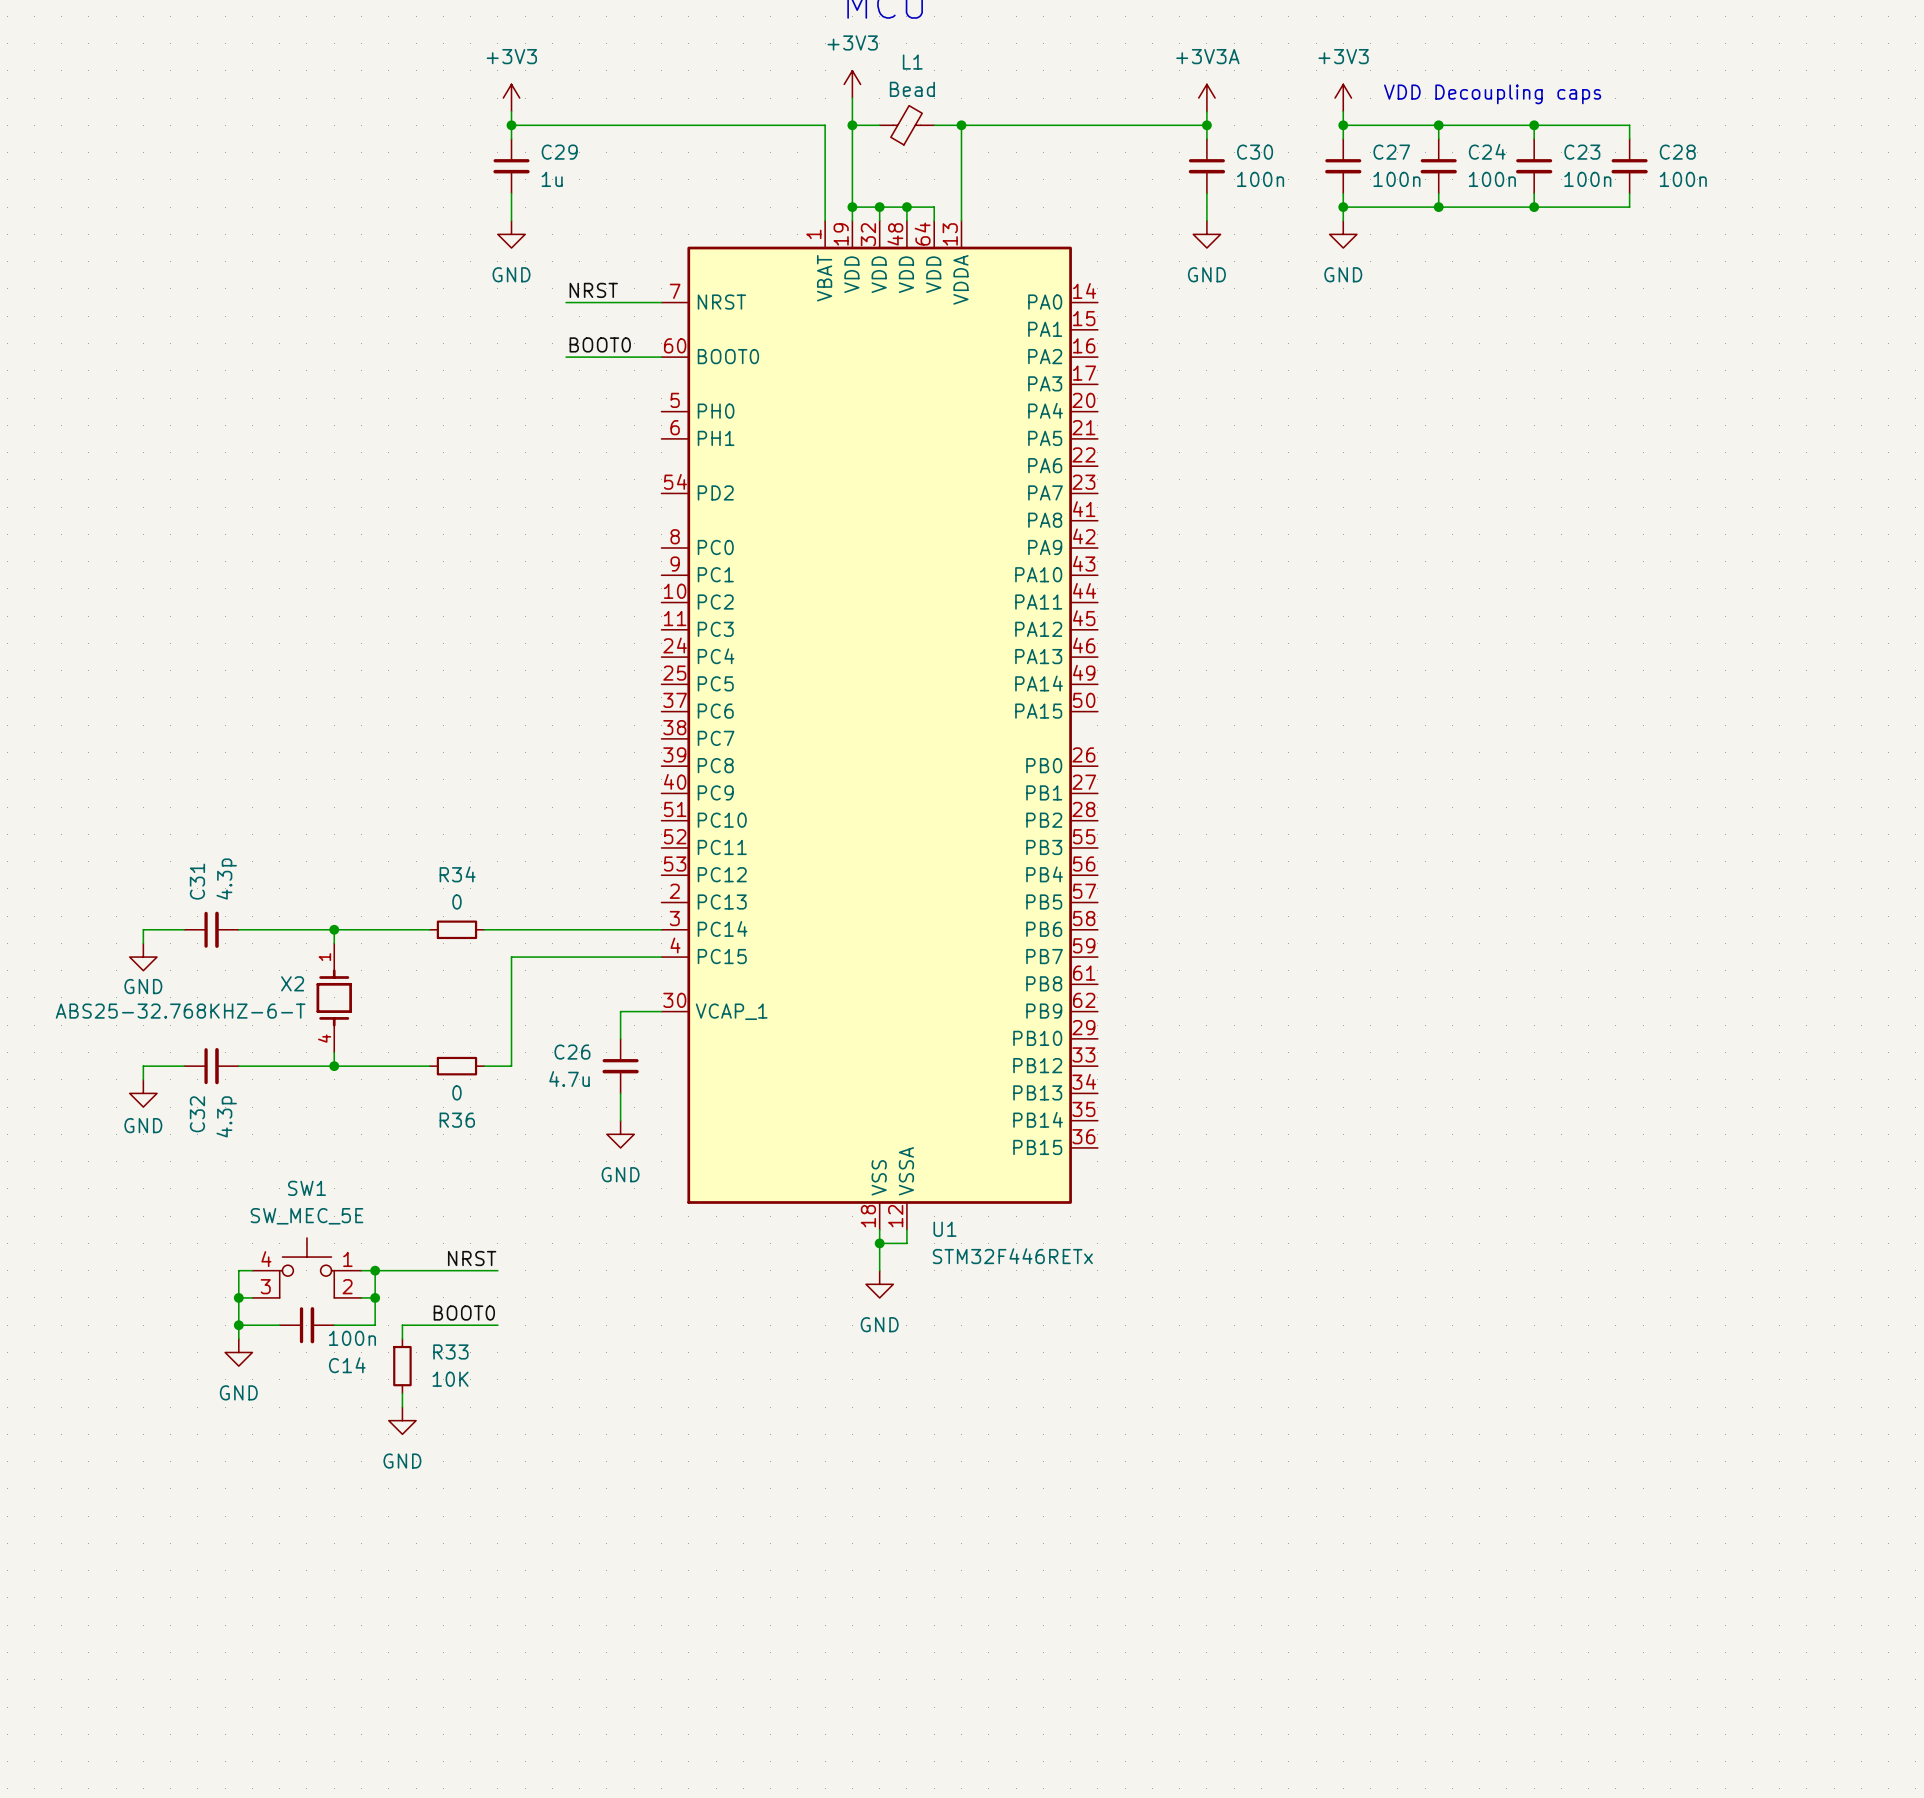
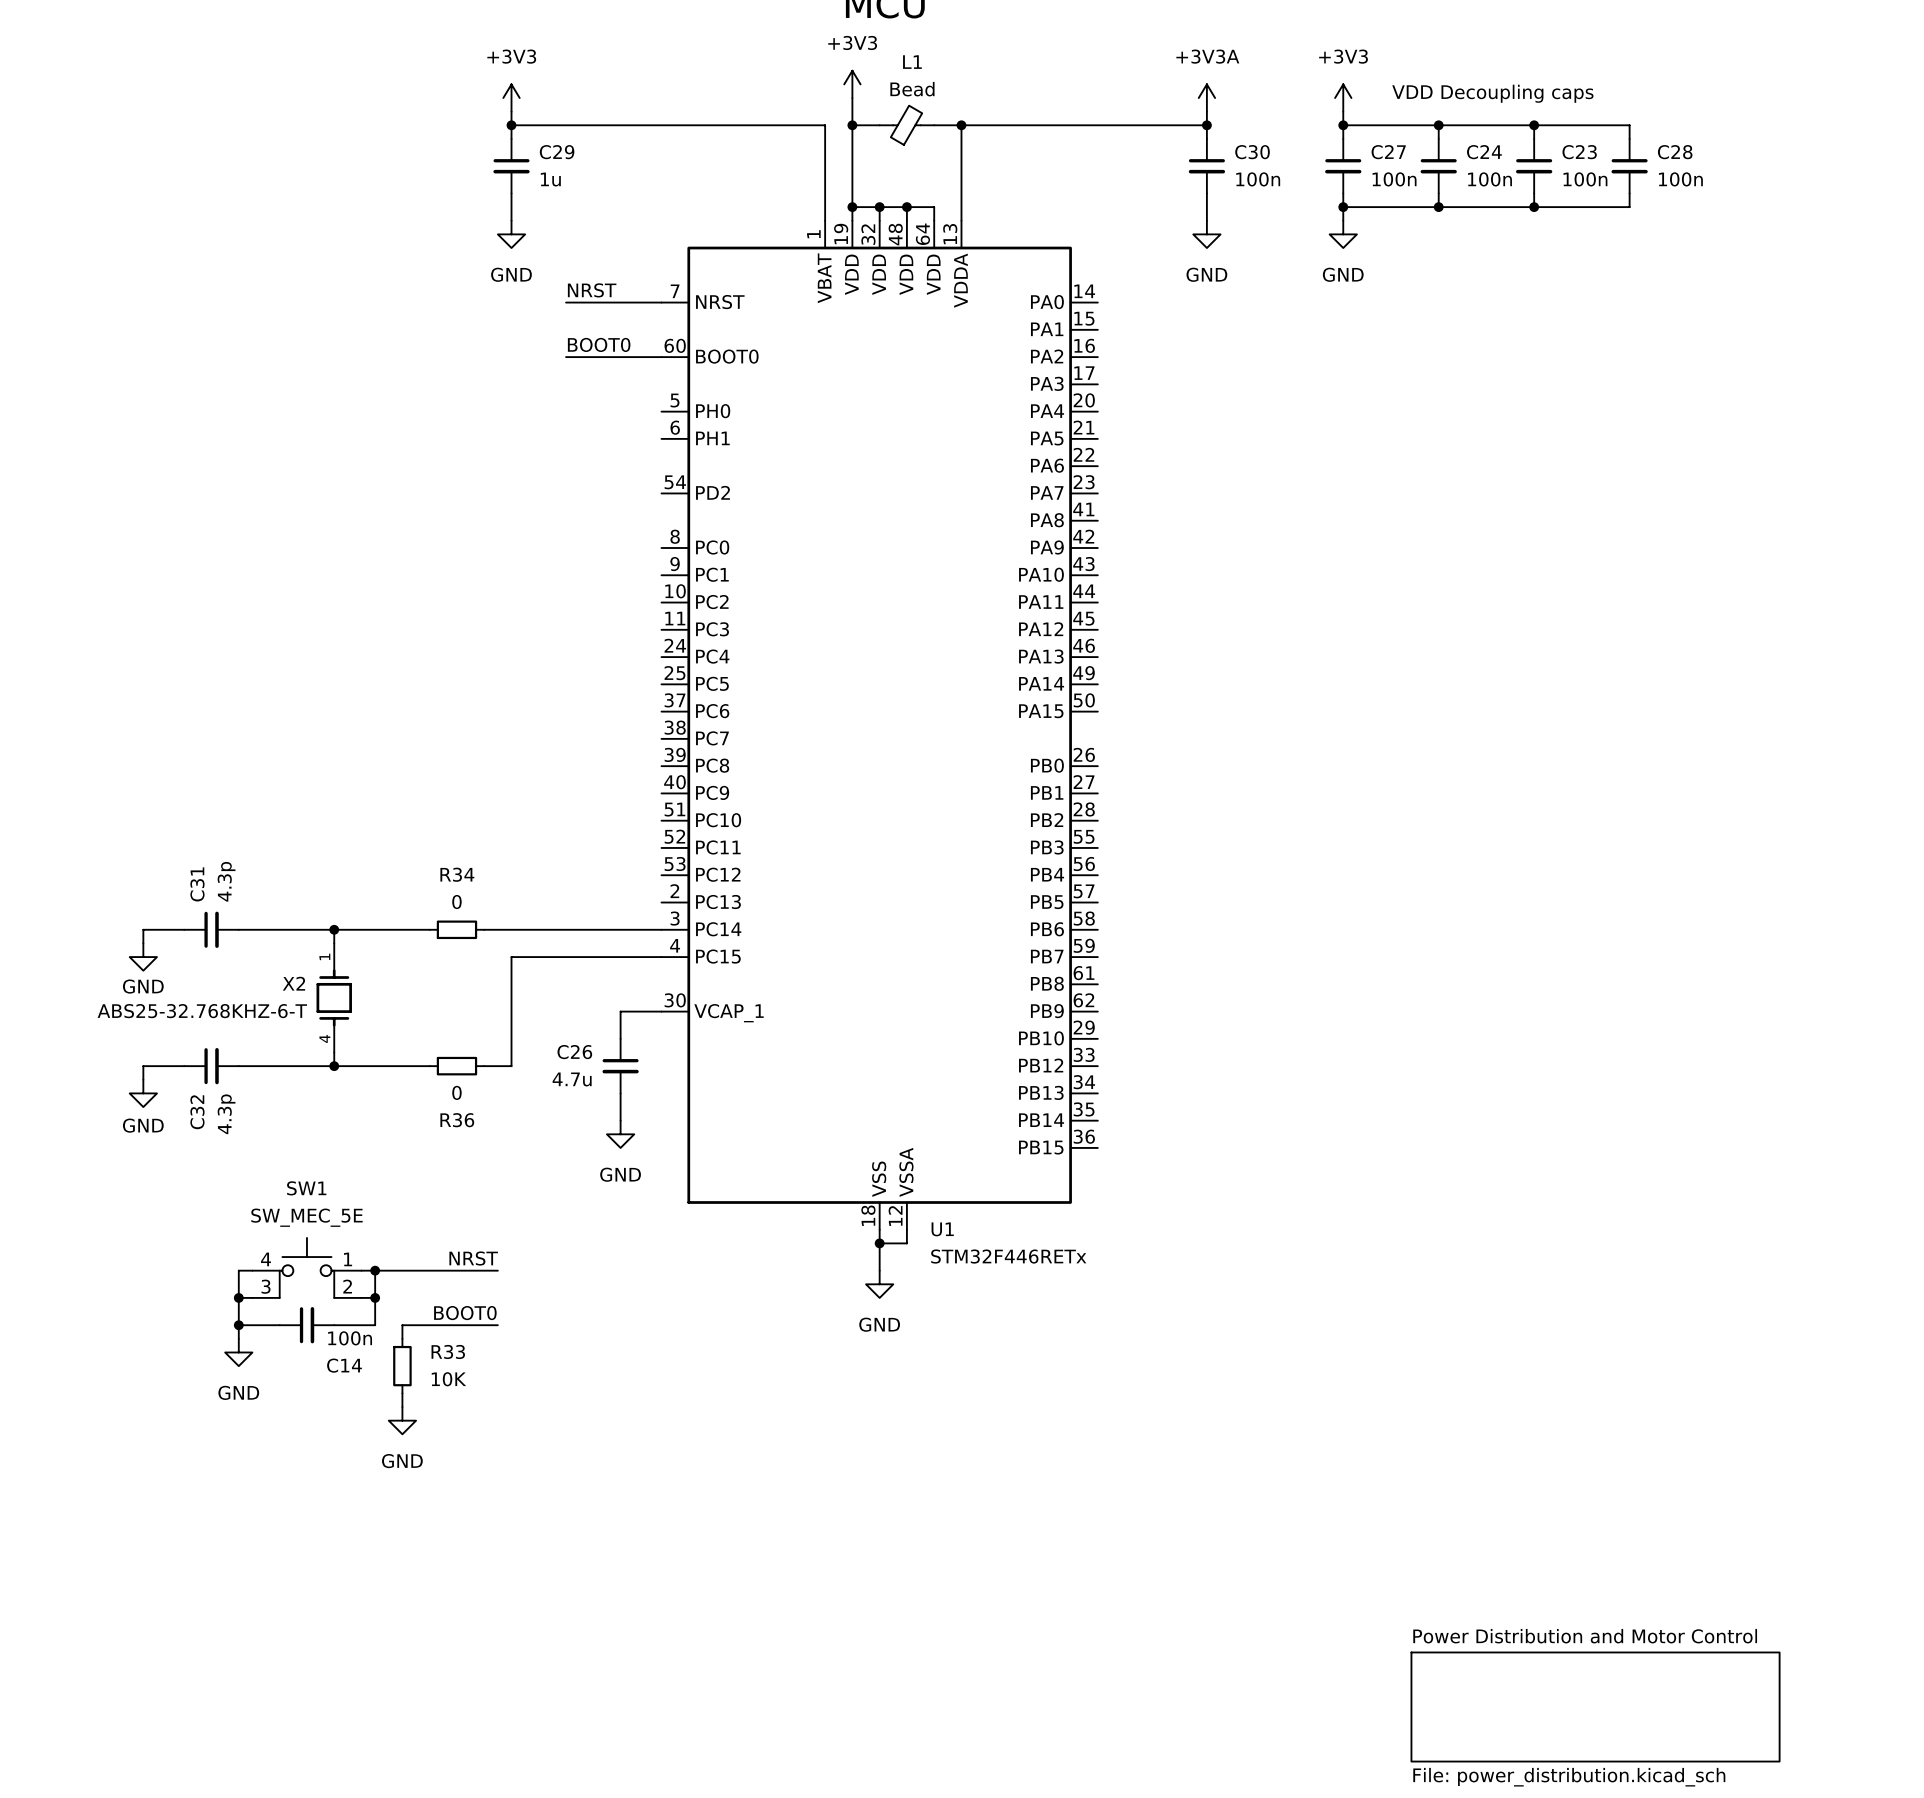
sheet Power Distribution and Motor Control: none -> File: power_distribution.kicad_sch (1595, 1707)

